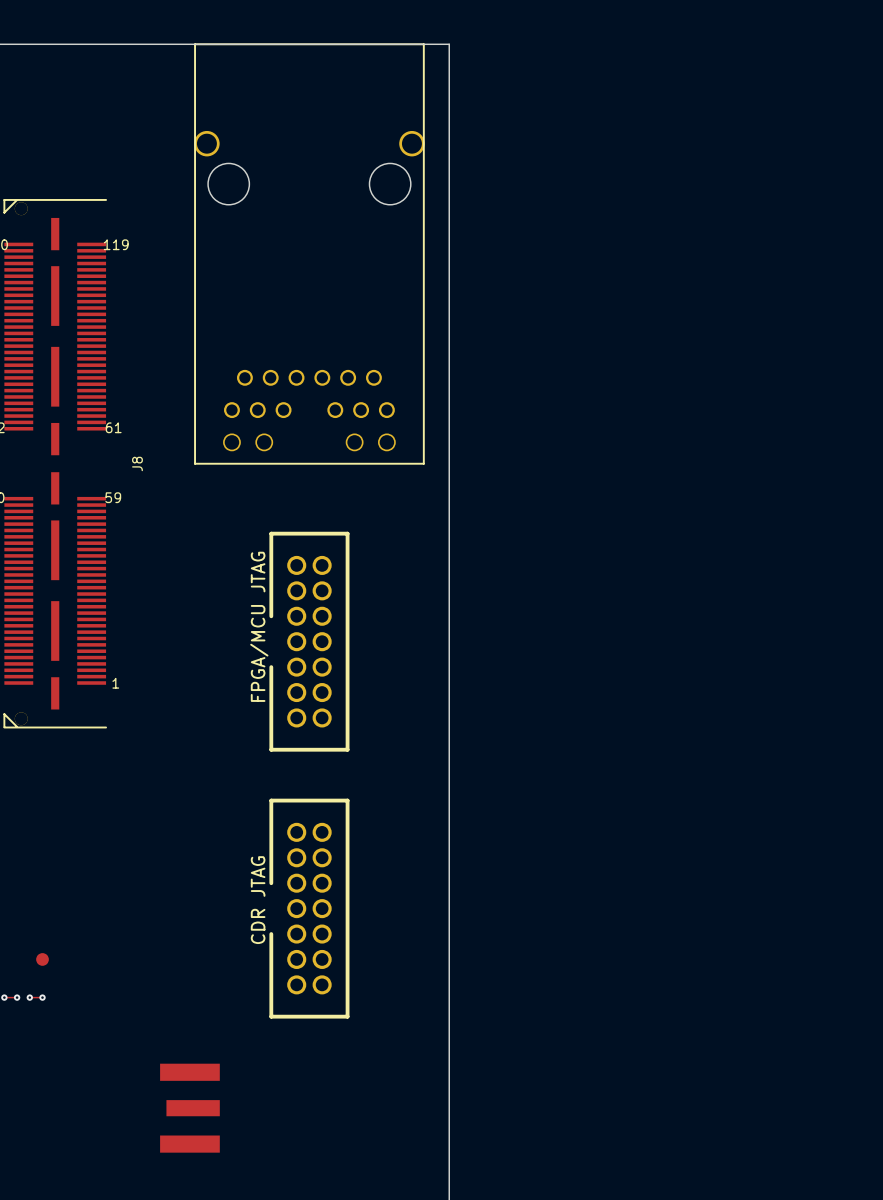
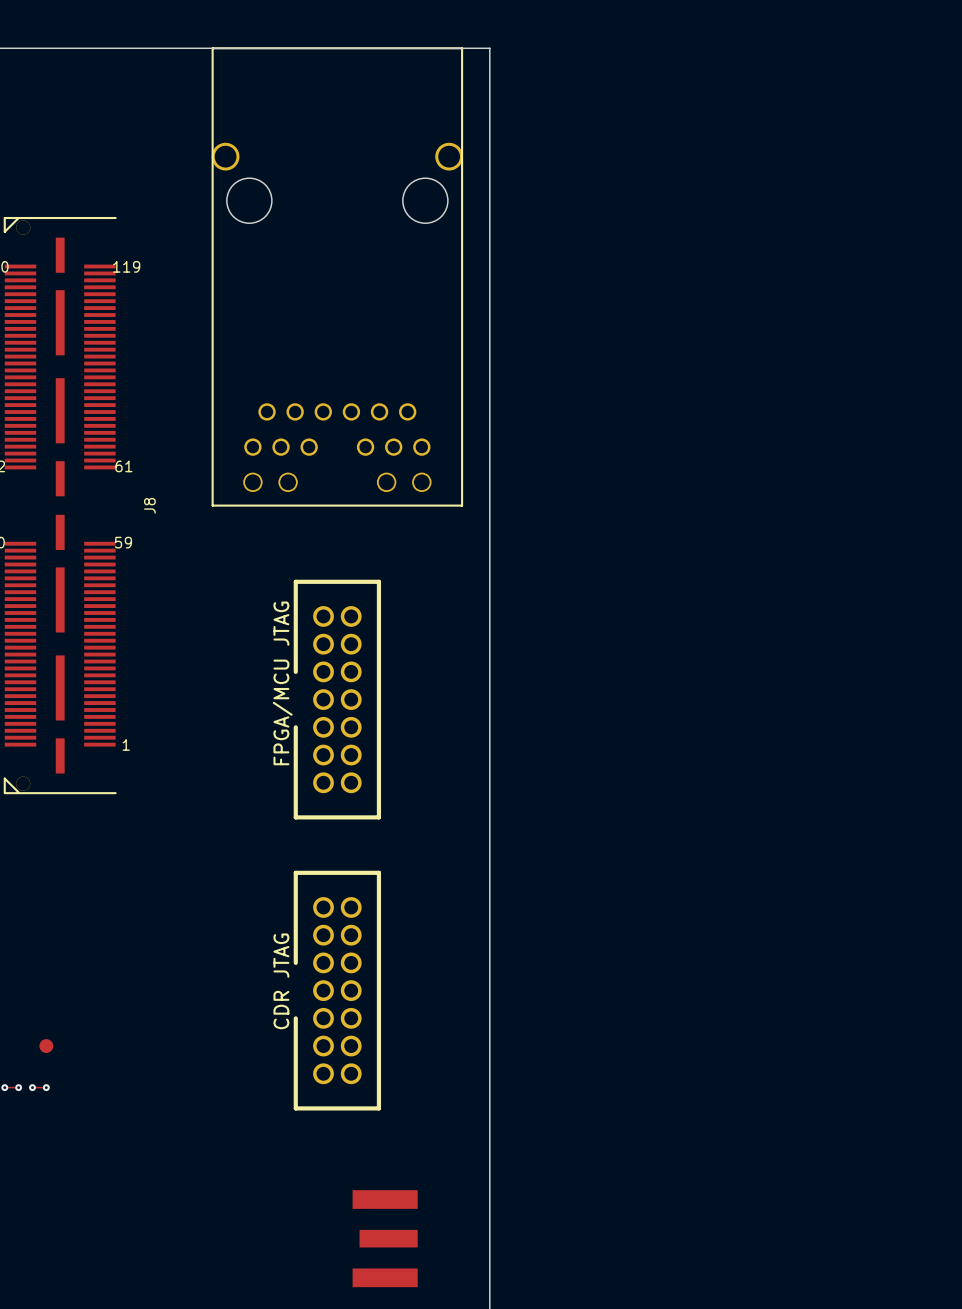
part position: (189, 1108) -> (385, 1238)

